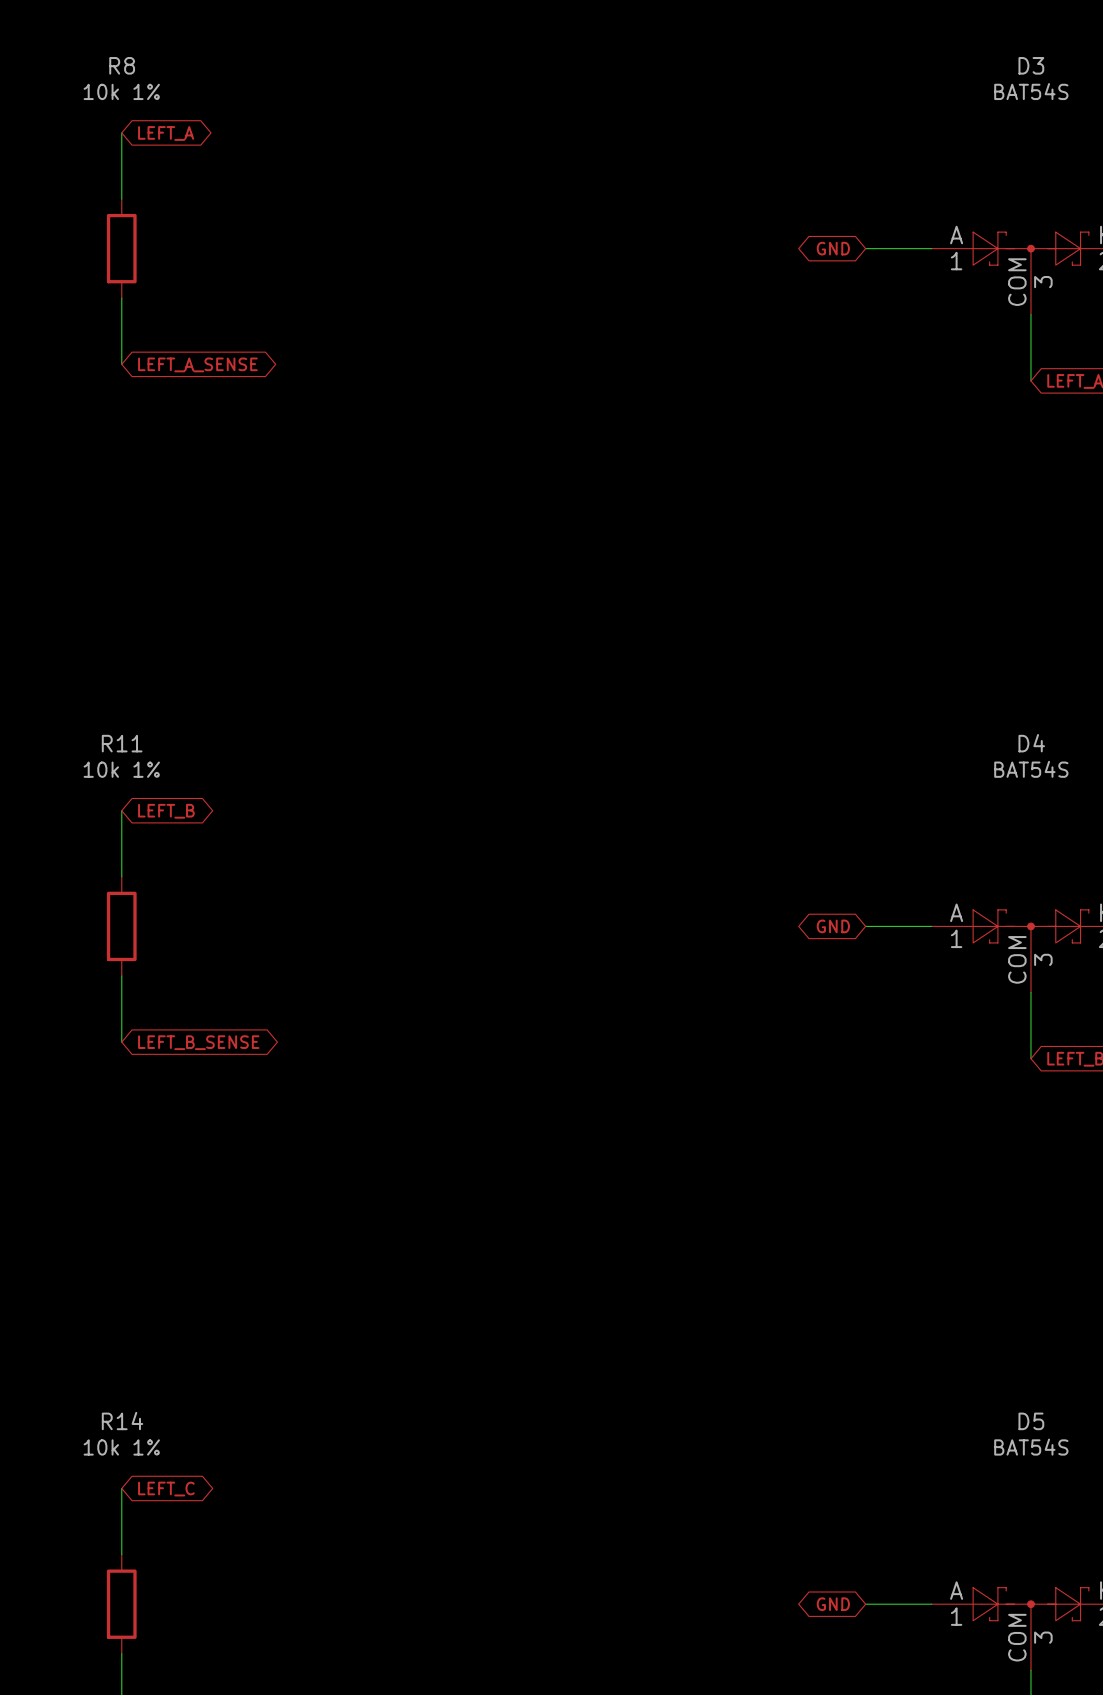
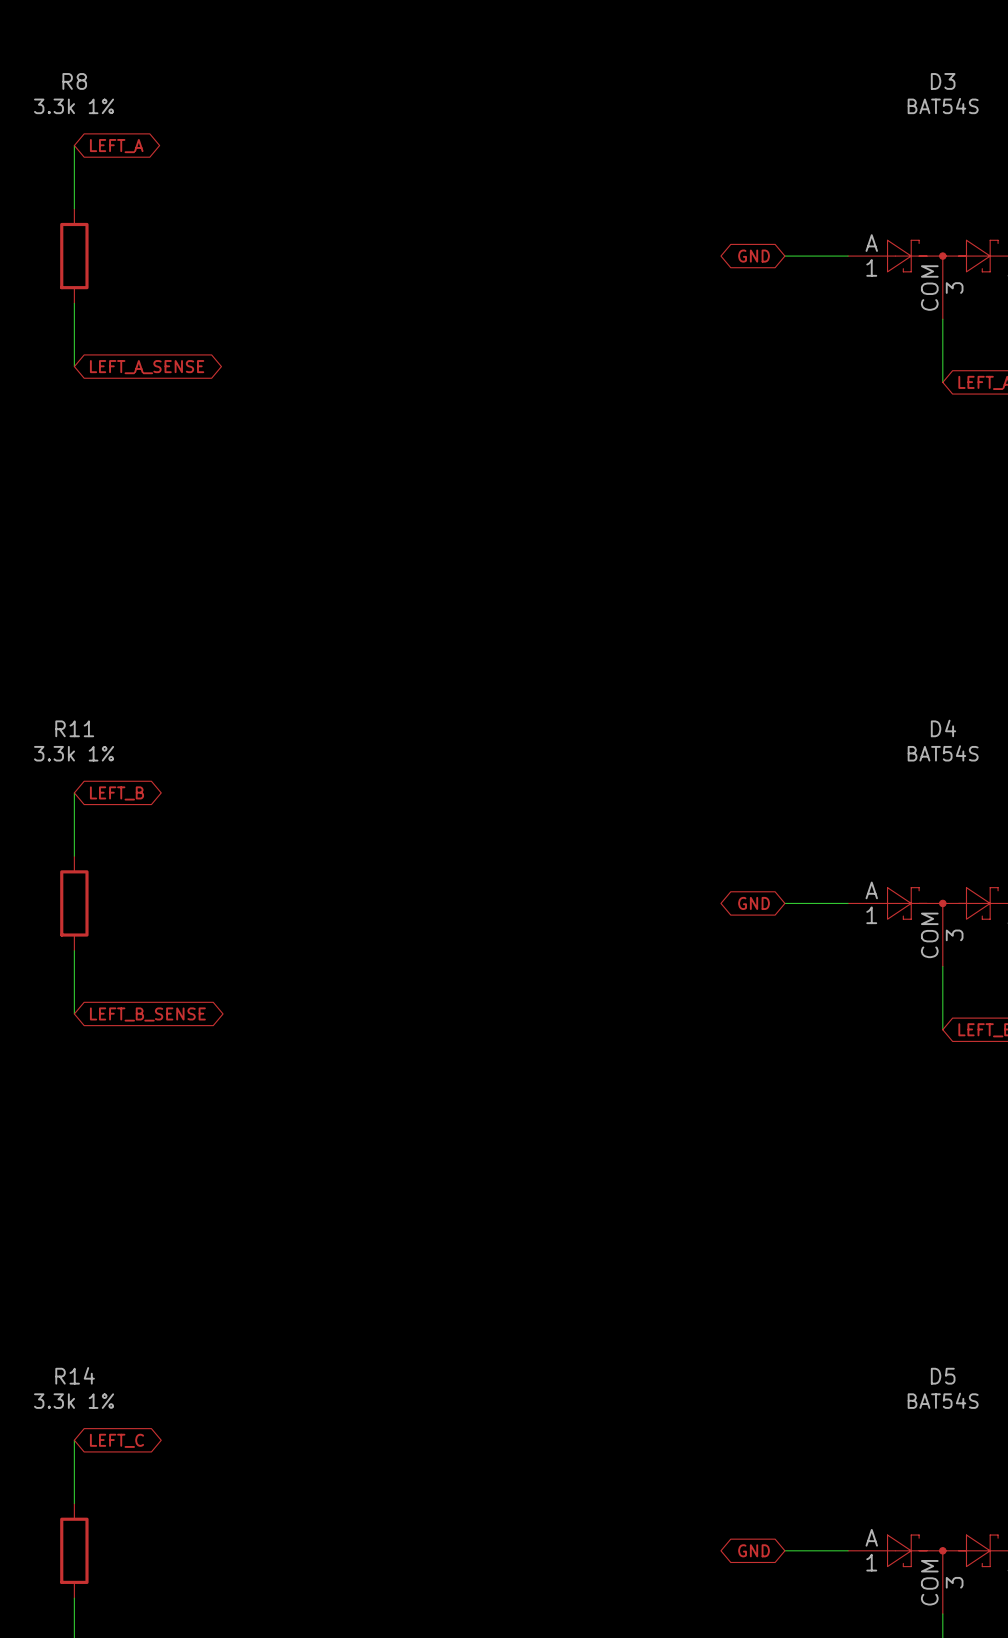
R8 value: 10k 1% (121, 91) -> 3.3k 1% (74, 106)
R11 value: 10k 1% (121, 769) -> 3.3k 1% (74, 753)
R14 value: 10k 1% (121, 1447) -> 3.3k 1% (74, 1401)

